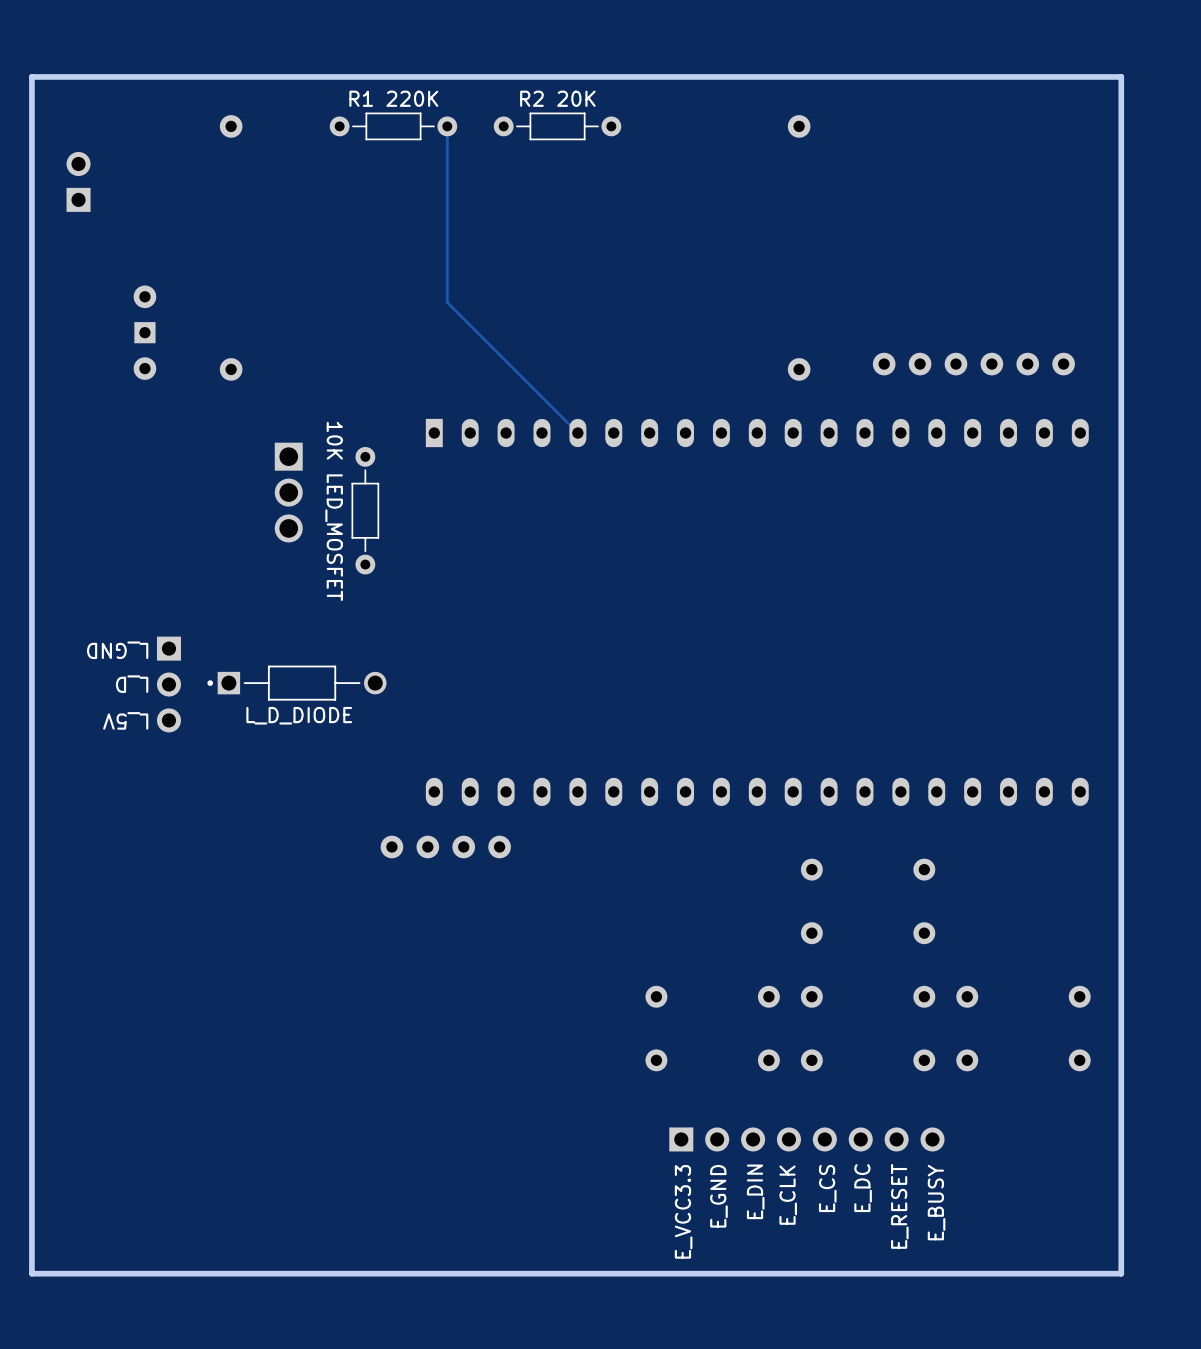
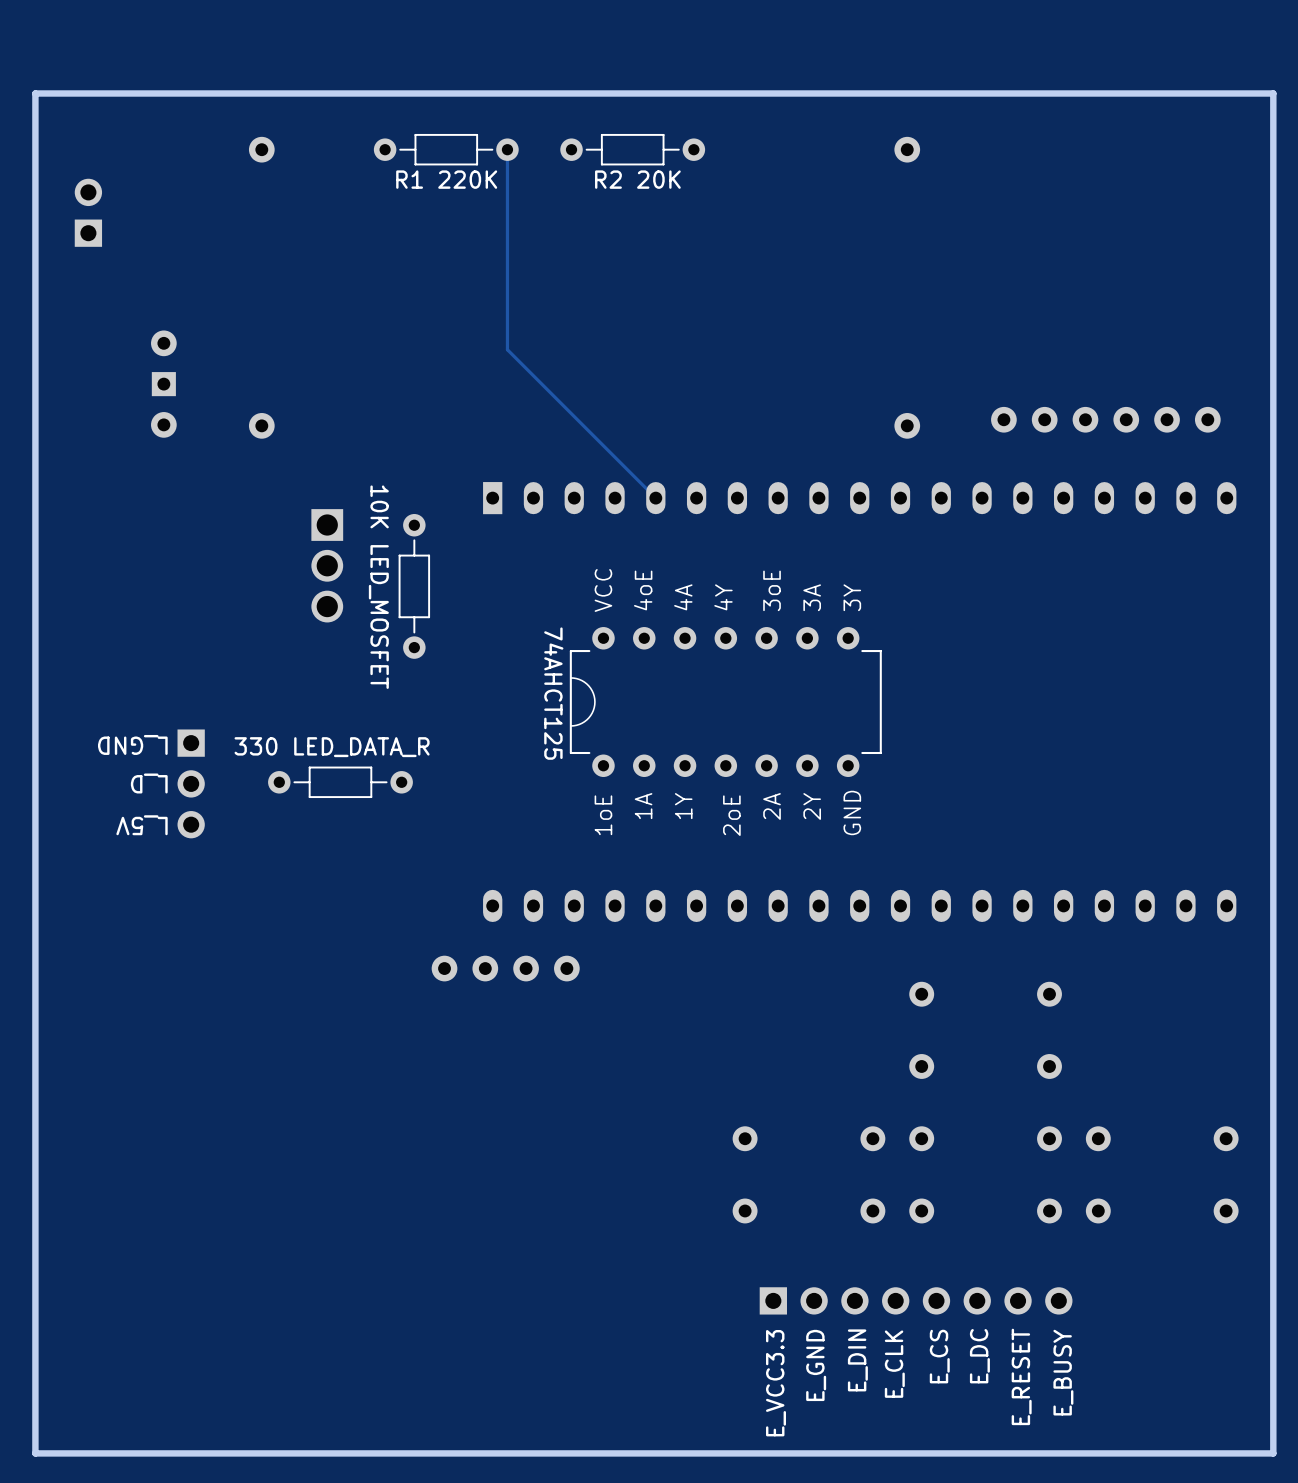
R1 220K name position: R1 220K (393, 98) -> R1 220K (446, 179)
R2 20K name position: R2 20K (557, 98) -> R2 20K (637, 179)
74AHCT125: none -> (725, 702)
L_D_DIODE: (296, 683) -> none
330 LED_DATA_R: none -> (340, 782)

